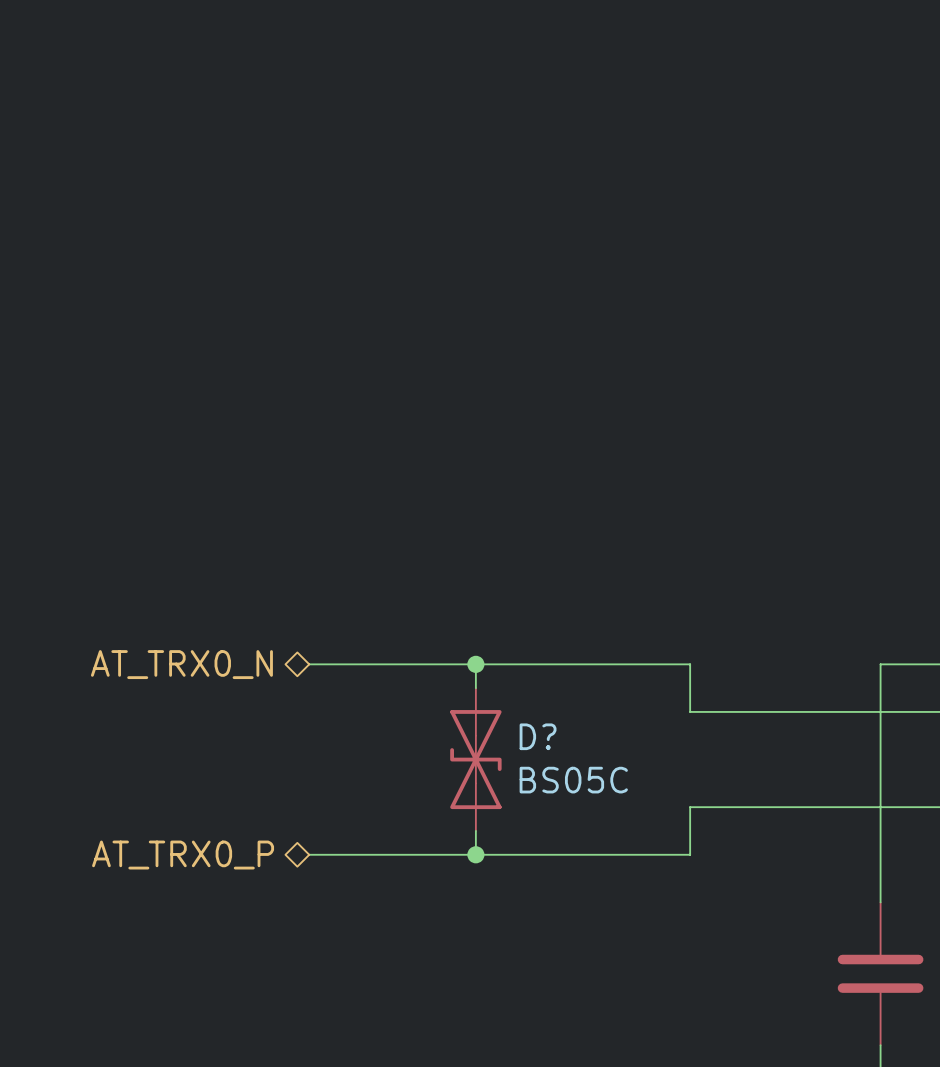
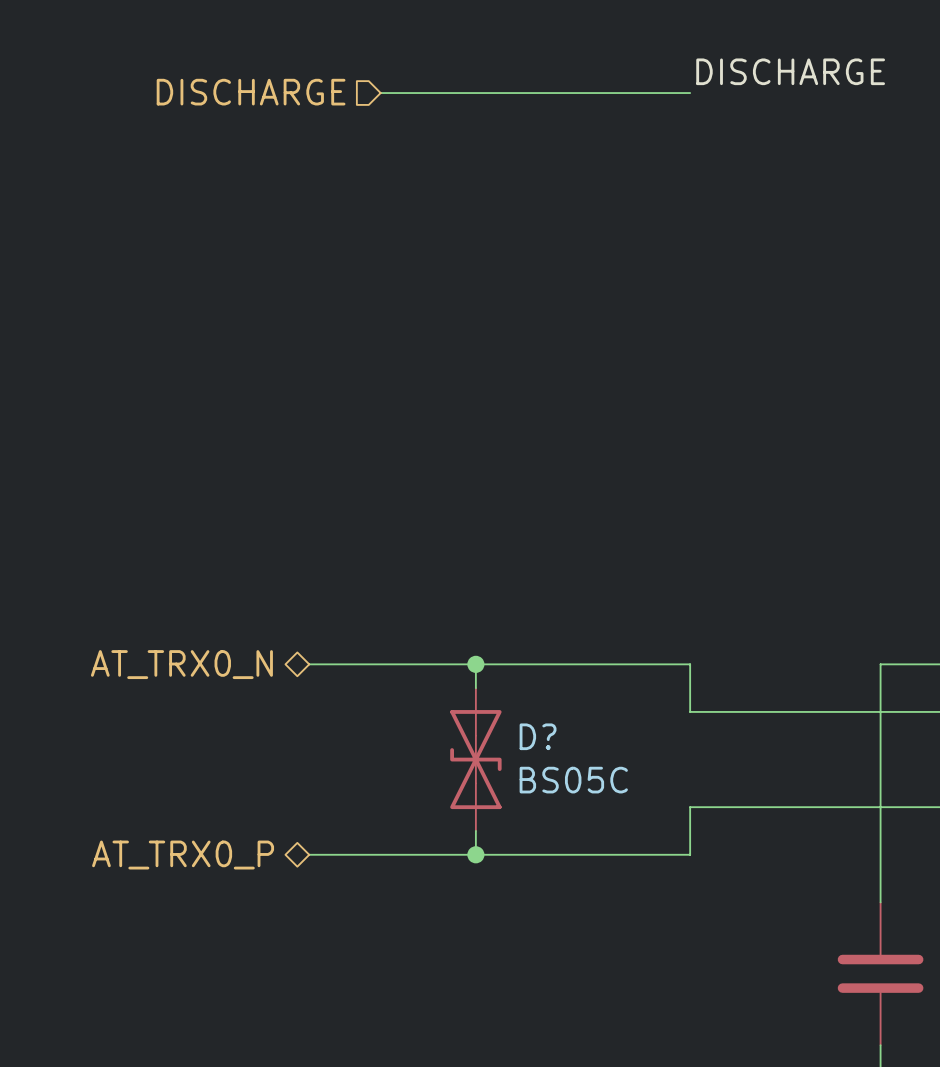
label: none -> DISCHARGE (790, 71)
hierarchical label: none -> DISCHARGE (251, 92)
wire: none -> (380, 93) (690, 93)

